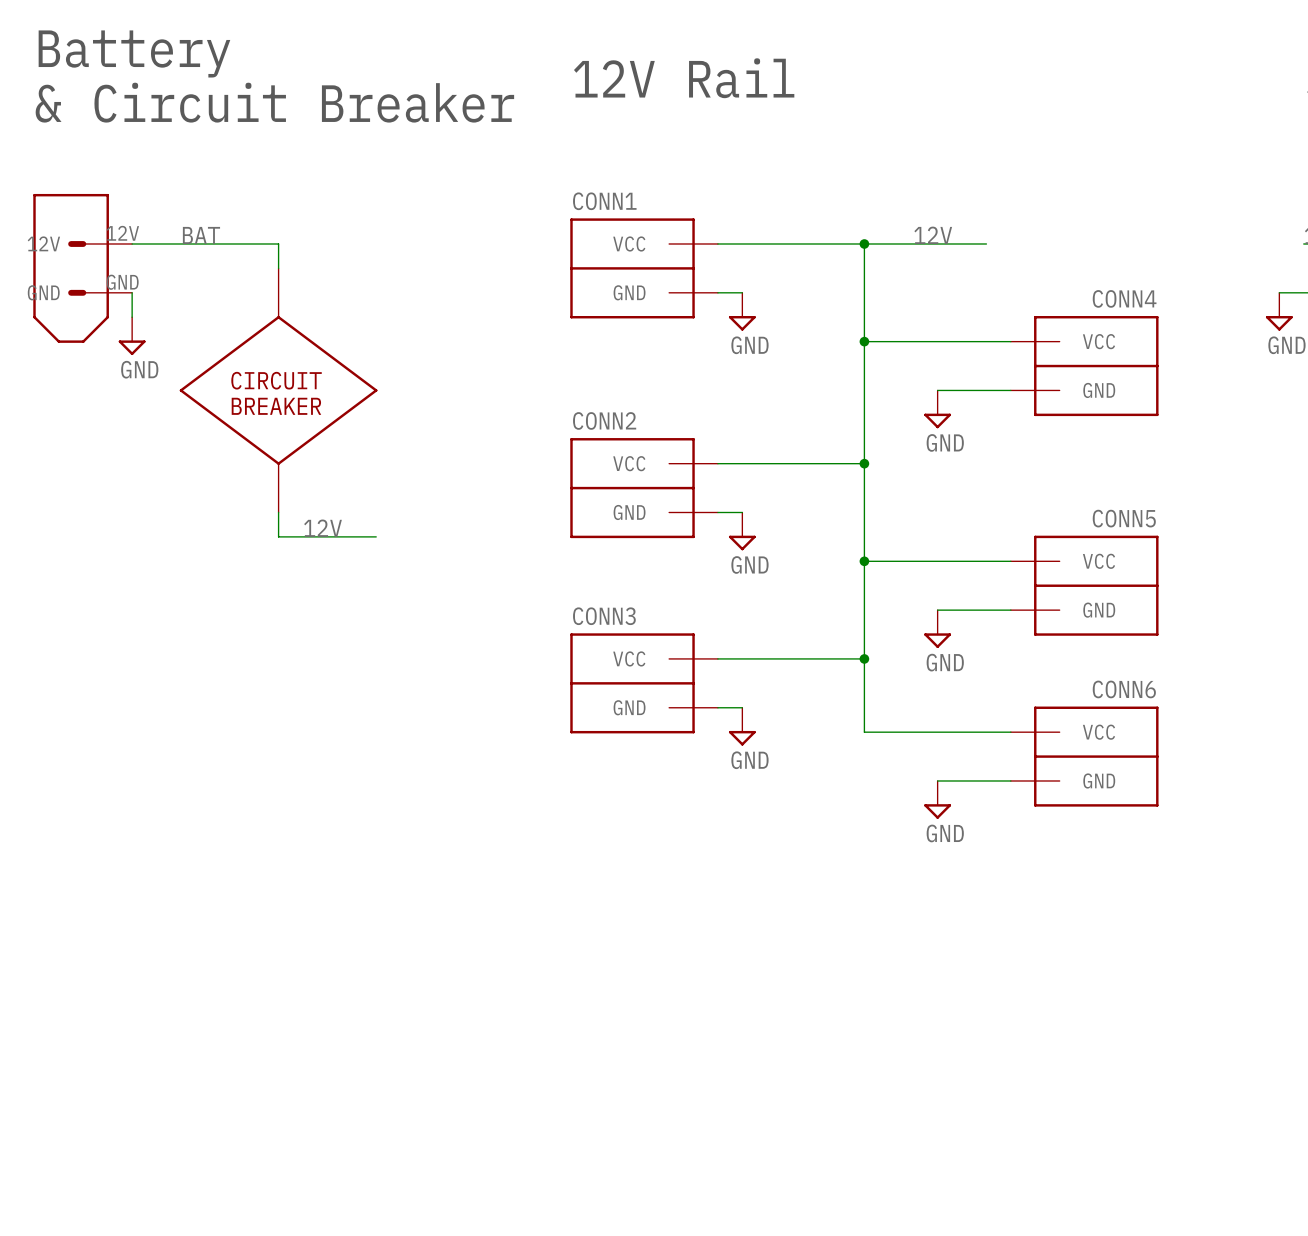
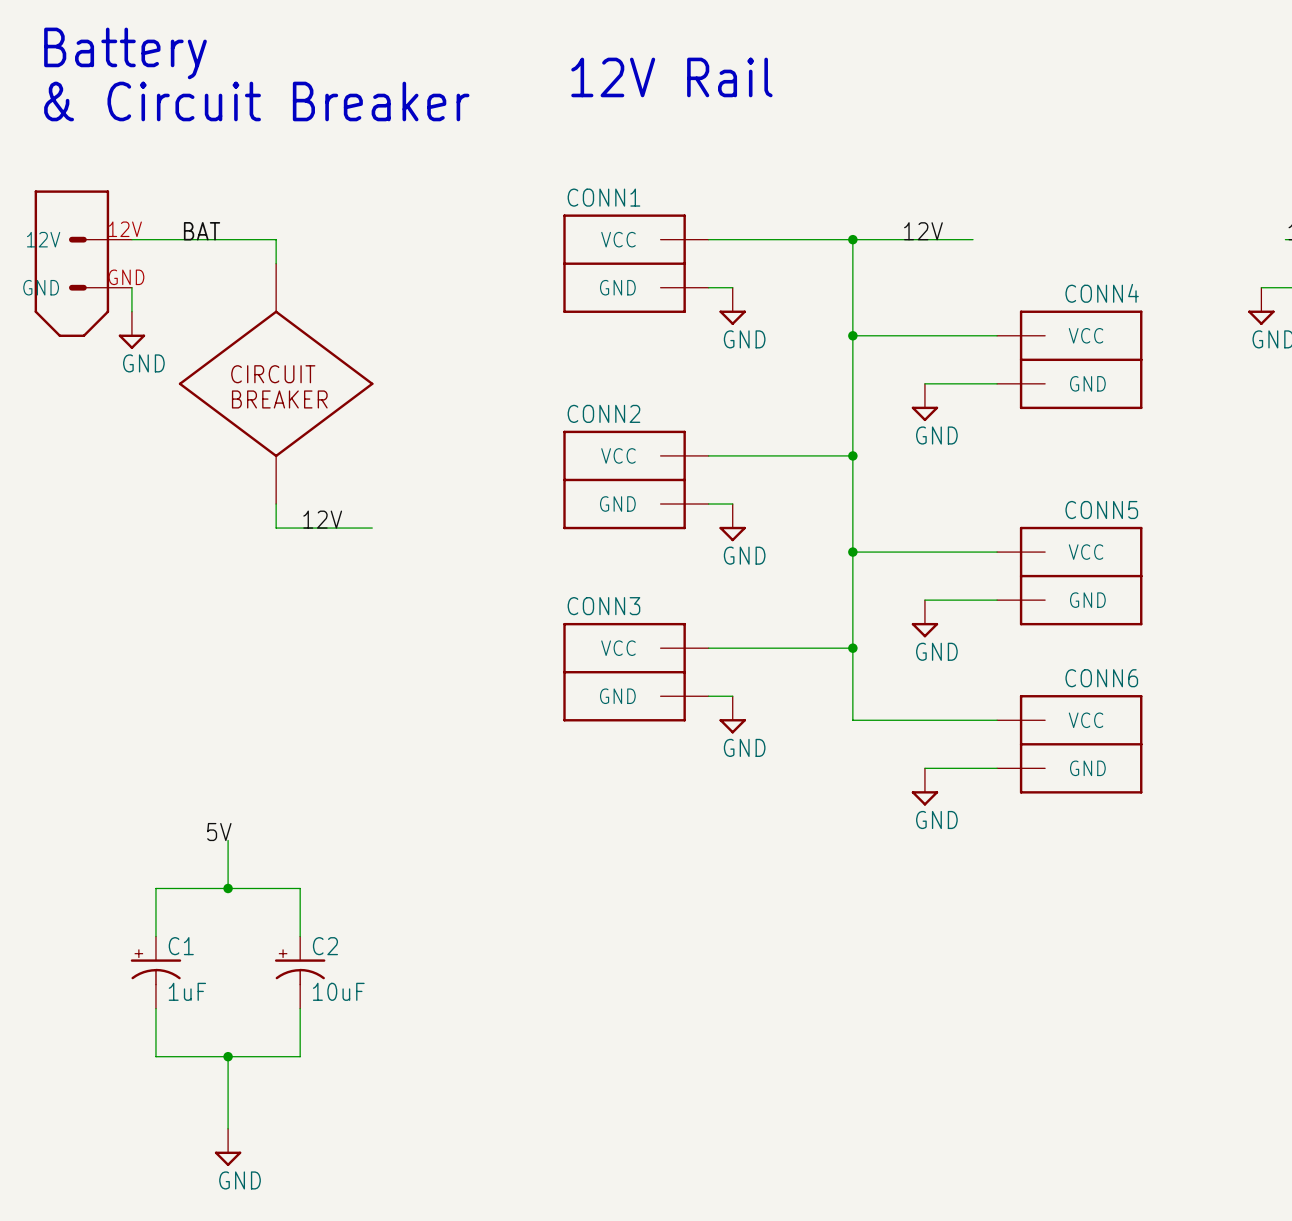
label: none -> 5V (219, 832)
wire: none -> (228, 840) (228, 888)
junction: none -> (228, 888)
wire: none -> (155, 936) (155, 888) (300, 888) (300, 936)
C1: none -> 1uF (155, 972)
C2: none -> 10uF (300, 972)
wire: none -> (155, 1008) (155, 1056) (300, 1056) (300, 1008)
wire: none -> (228, 1056) (228, 1128)
junction: none -> (228, 1056)
power symbol: none -> GND (228, 1147)

